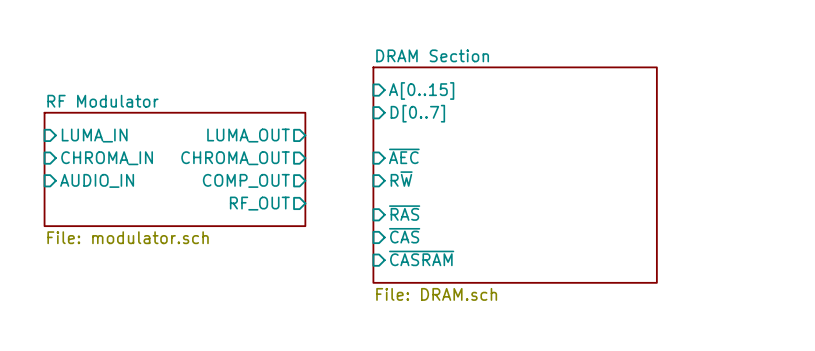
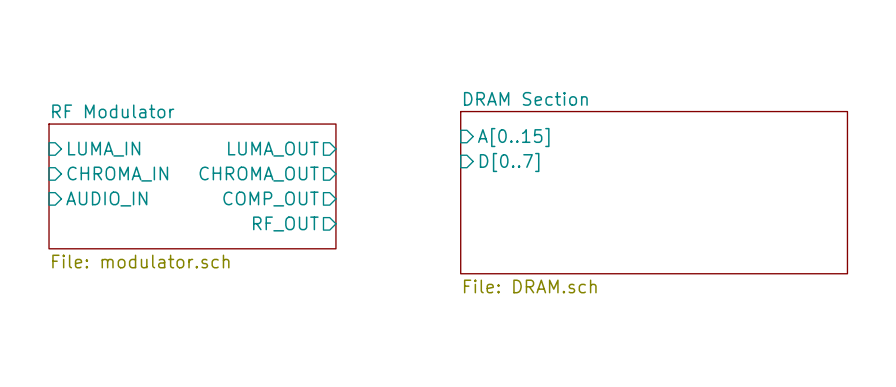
sheet pin position: A[0..15] (421, 90) -> A[0..15] (513, 137)
sheet pin position: D[0..7] (417, 113) -> D[0..7] (509, 162)
sheet pin: ~{AEC} (404, 156) -> none
sheet DRAM Section: File: DRAM.sch (515, 175) -> none
sheet DRAM Section: none -> File: DRAM.sch (654, 192)
sheet pin: R~{W} (401, 179) -> none
sheet pin: ~{RAS} (404, 213) -> none
sheet pin: ~{CAS} (404, 235) -> none
sheet pin: ~{CASRAM} (421, 258) -> none

